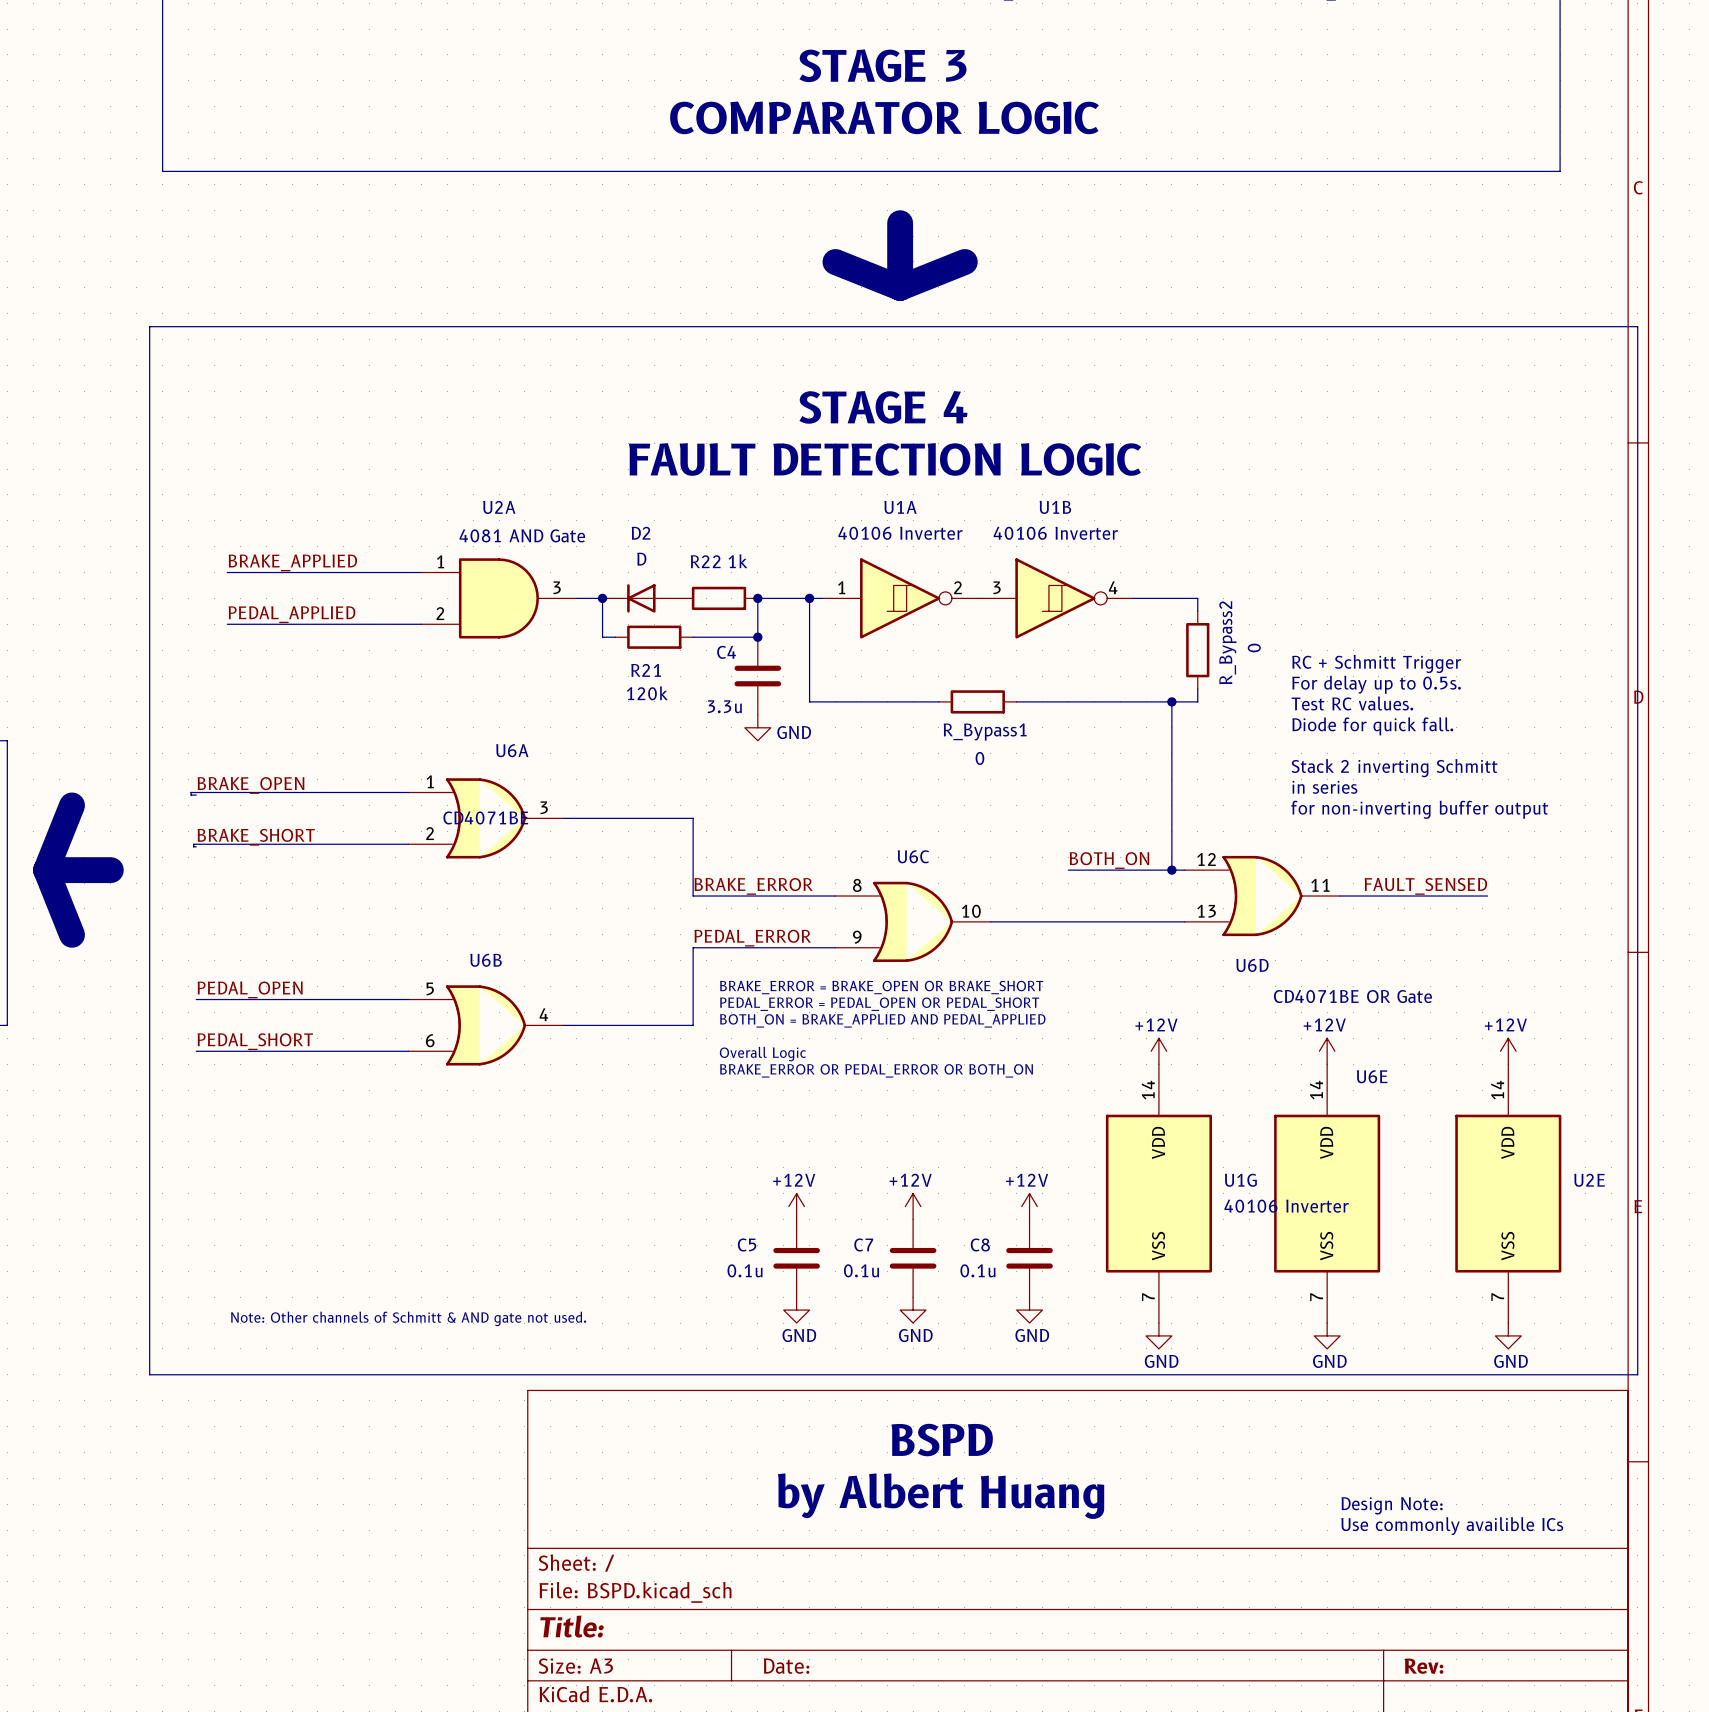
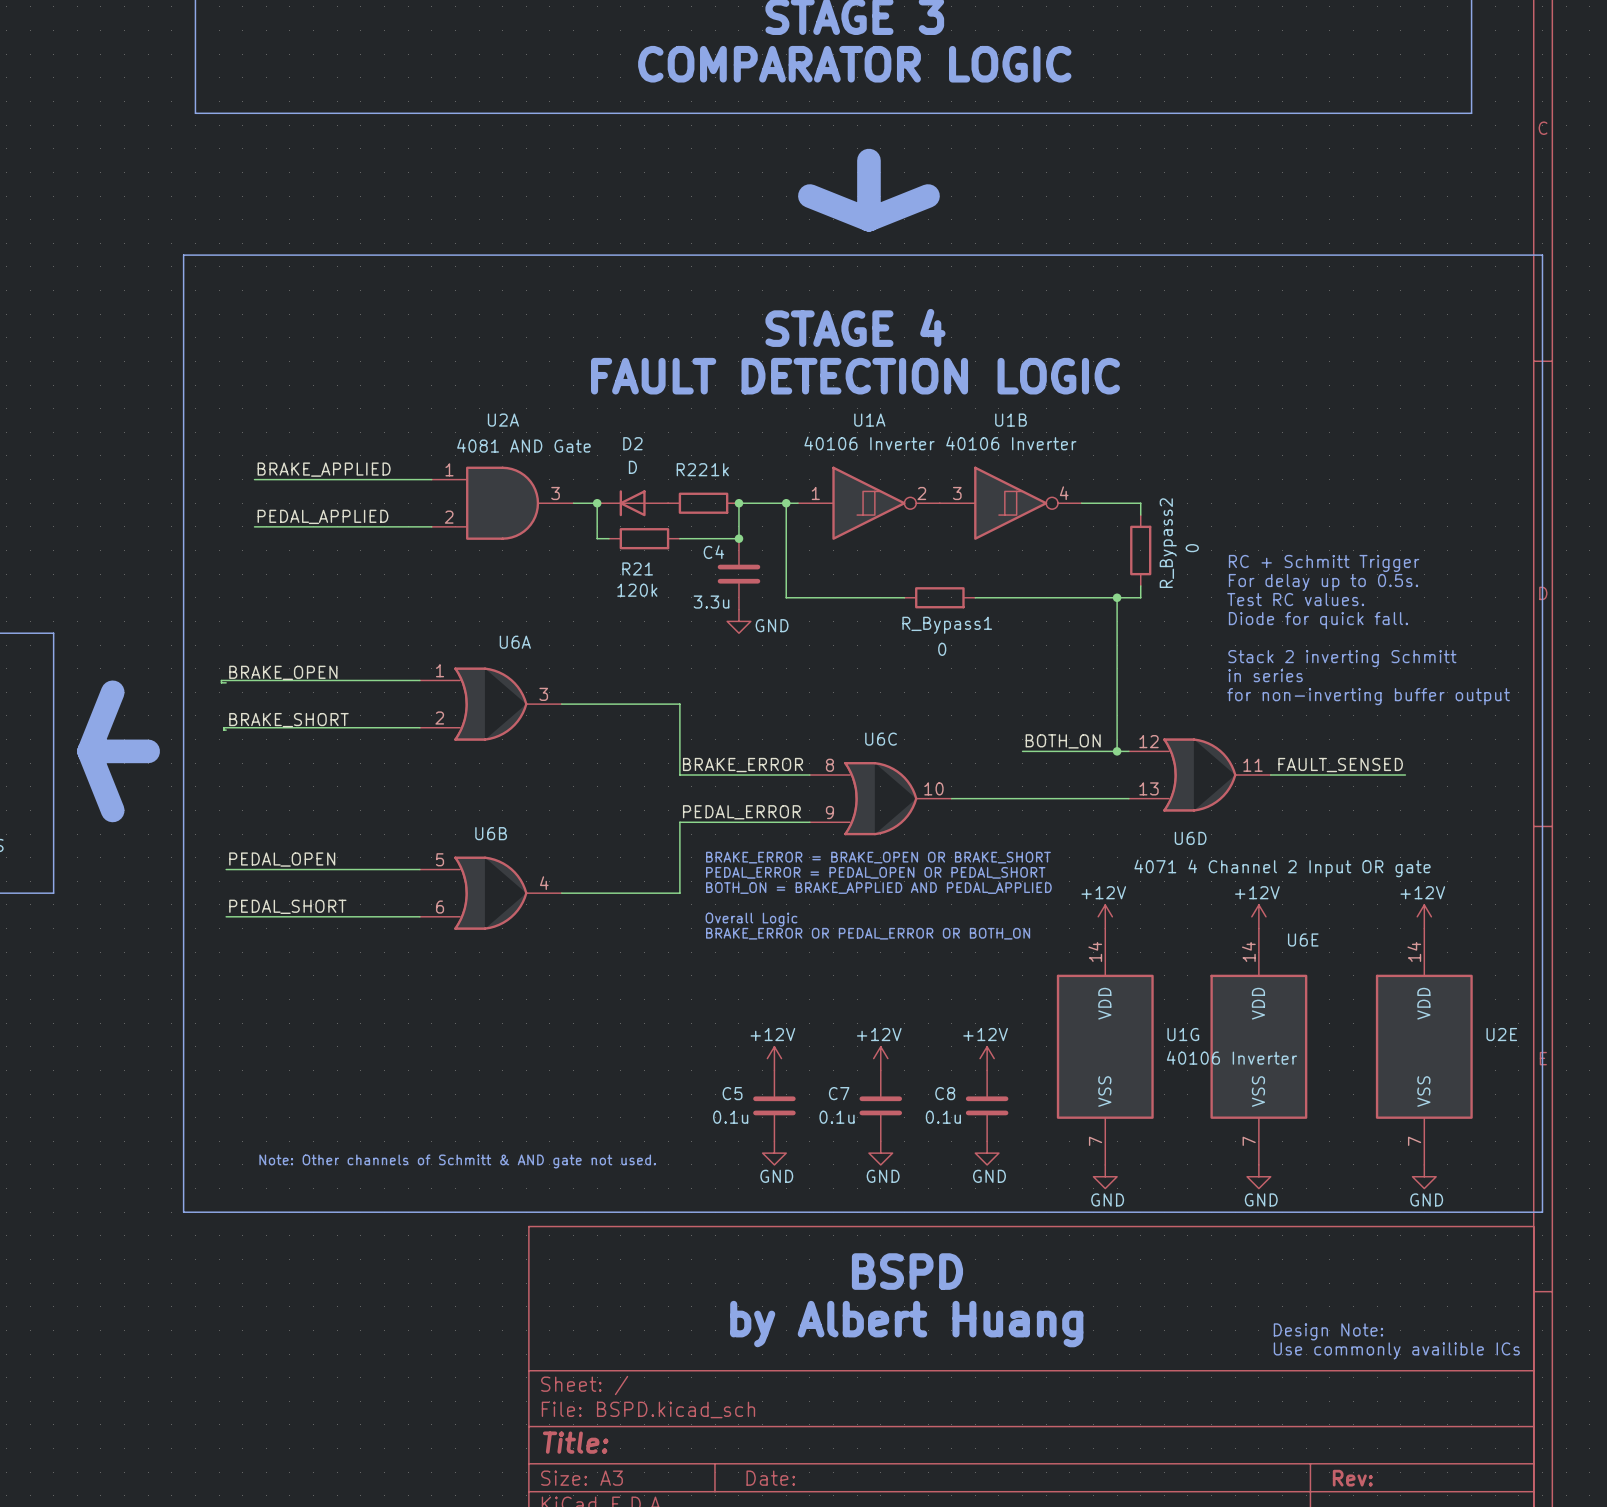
U6A text: CD4071BE (485, 817) -> none
U6D value: CD4071BE OR Gate (1352, 996) -> 4071 4 Channel 2 Input OR gate (1282, 868)

